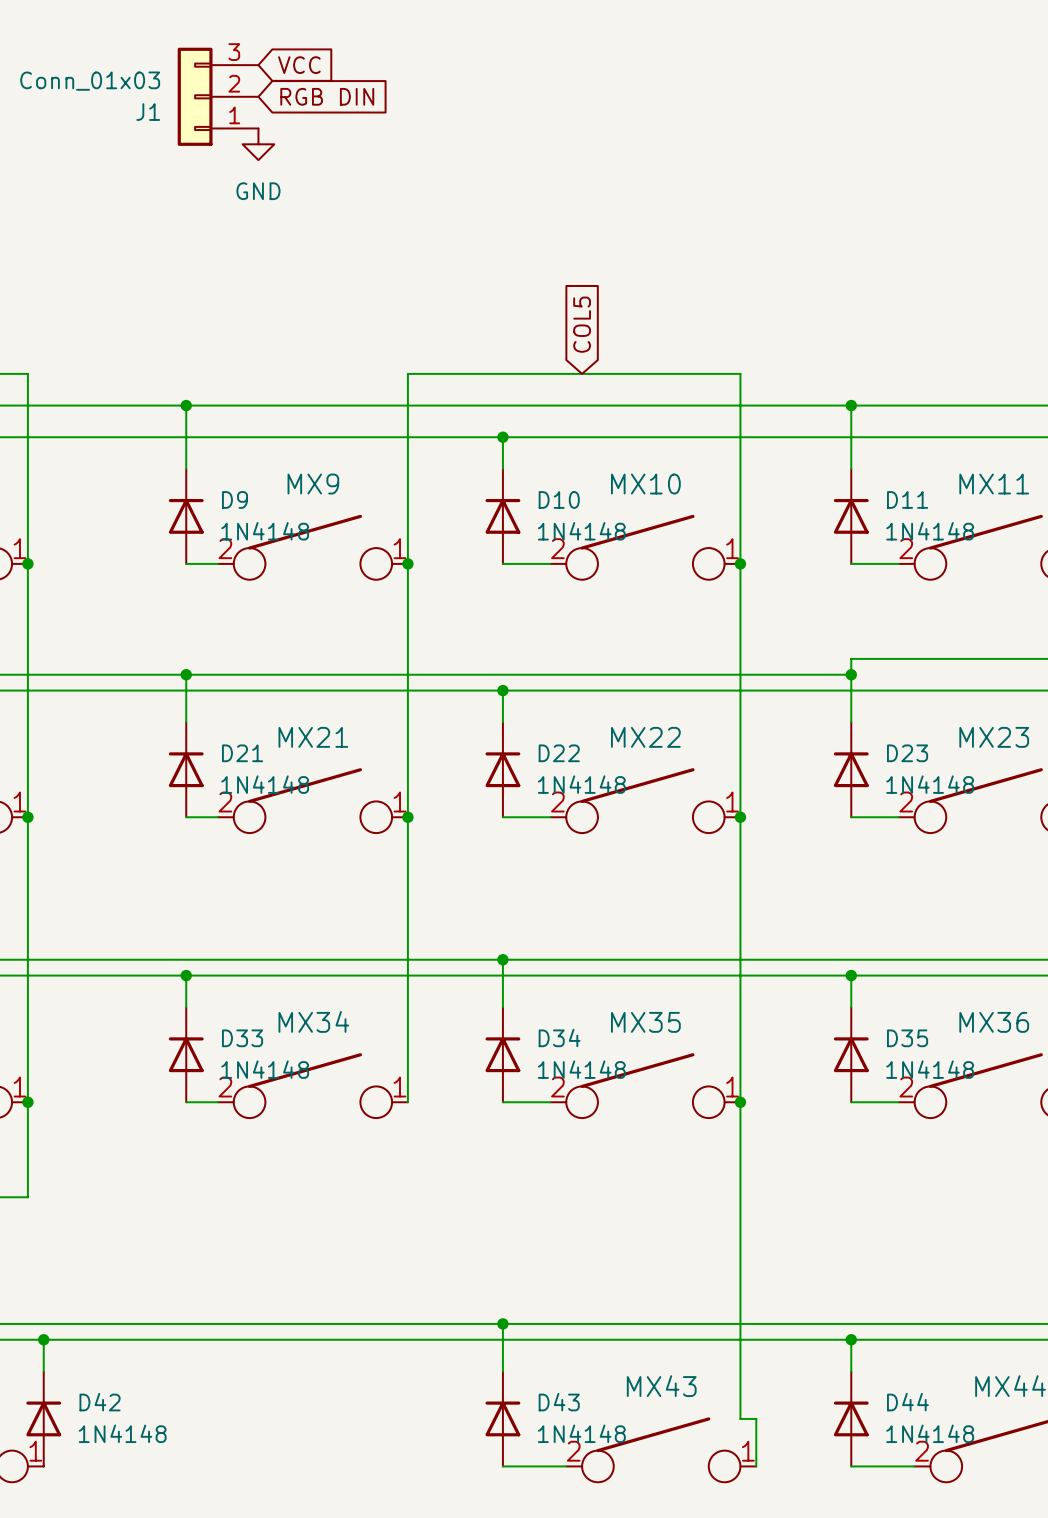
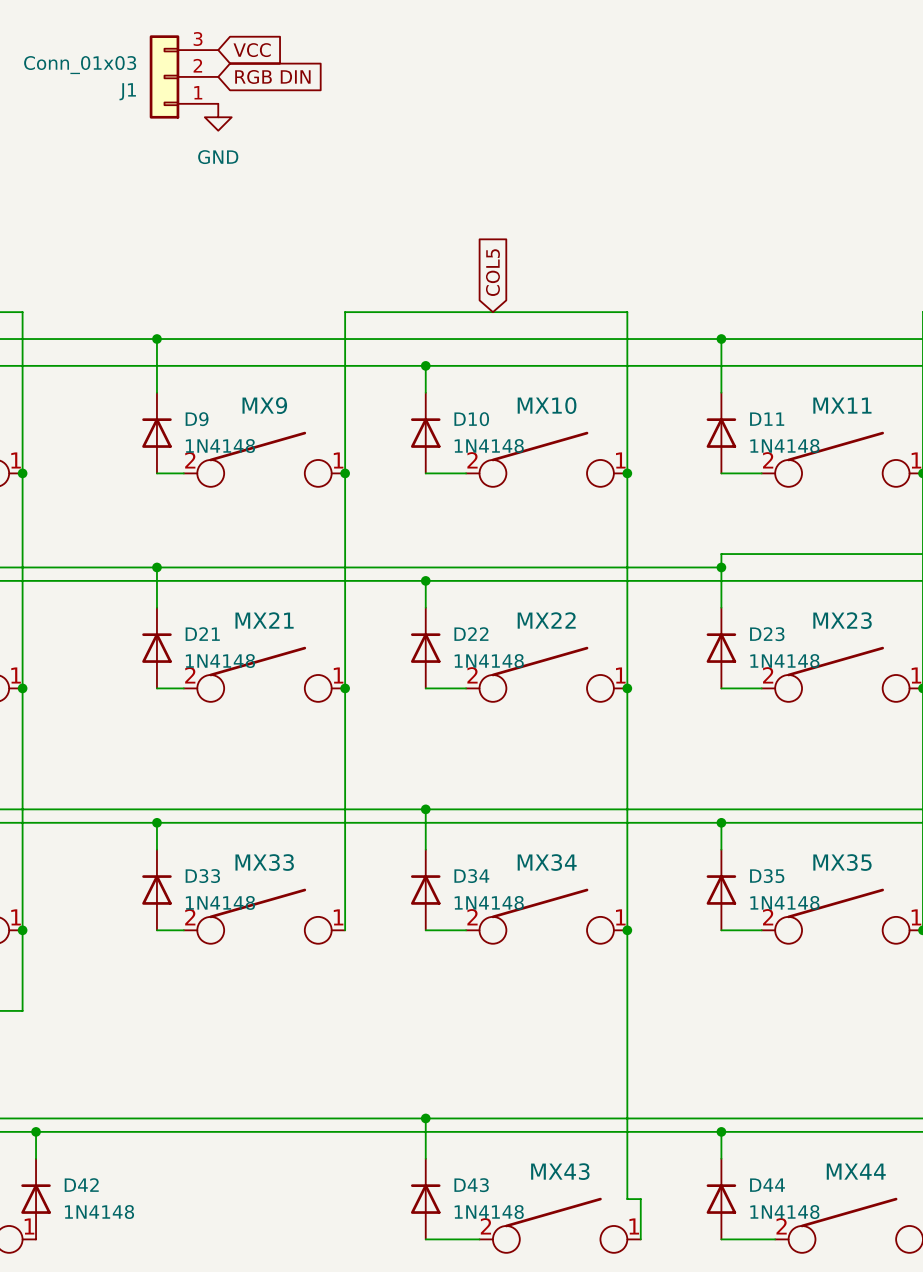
MX34 name: MX34 (313, 1021) -> MX33 (264, 862)
MX35 name: MX35 (645, 1022) -> MX34 (547, 862)
MX36 name: MX36 (994, 1022) -> MX35 (842, 862)

